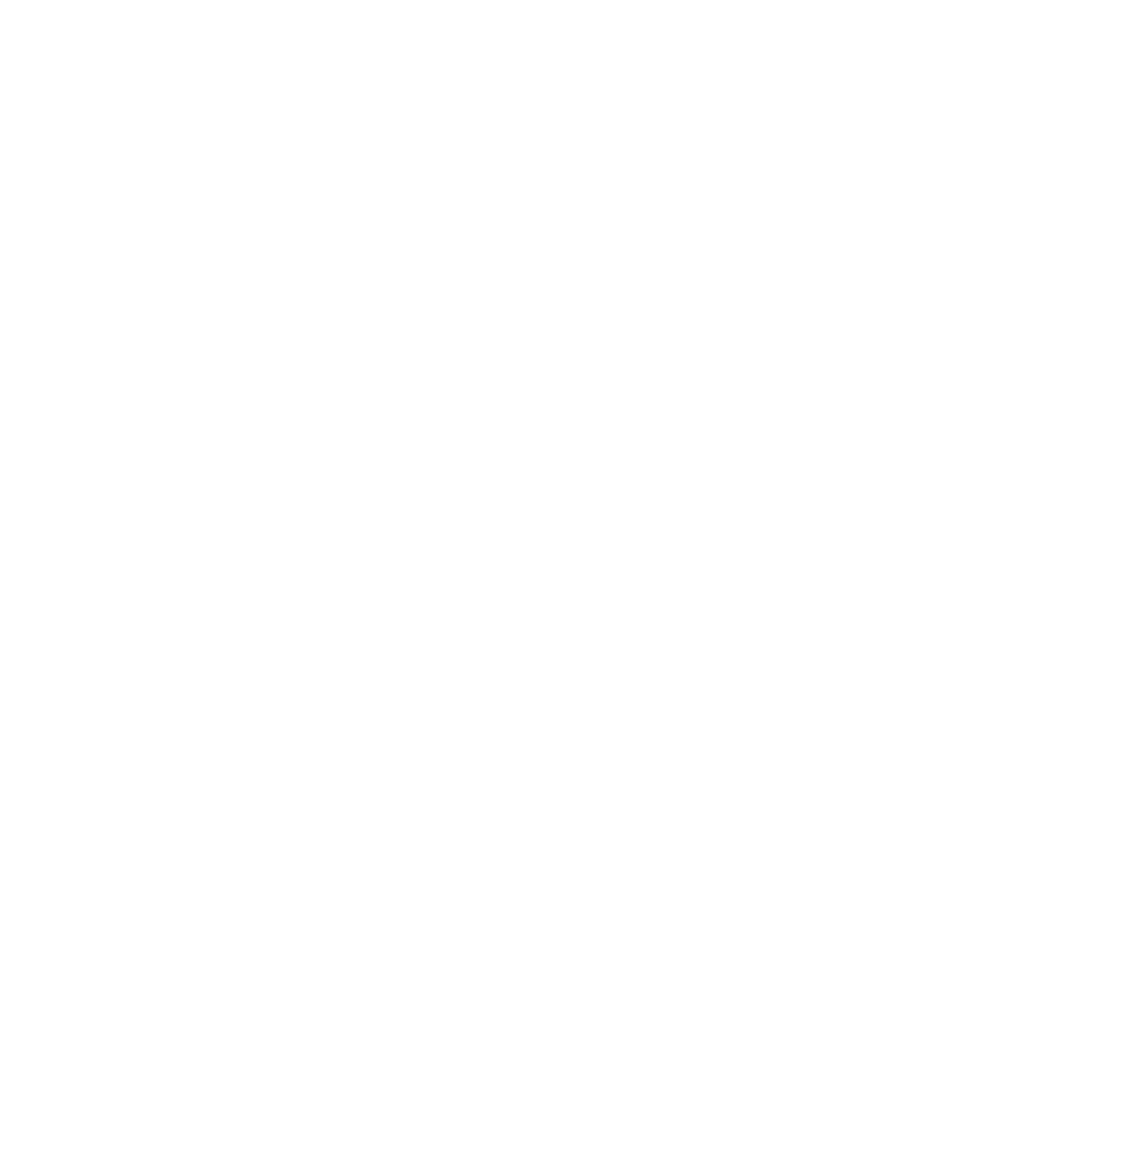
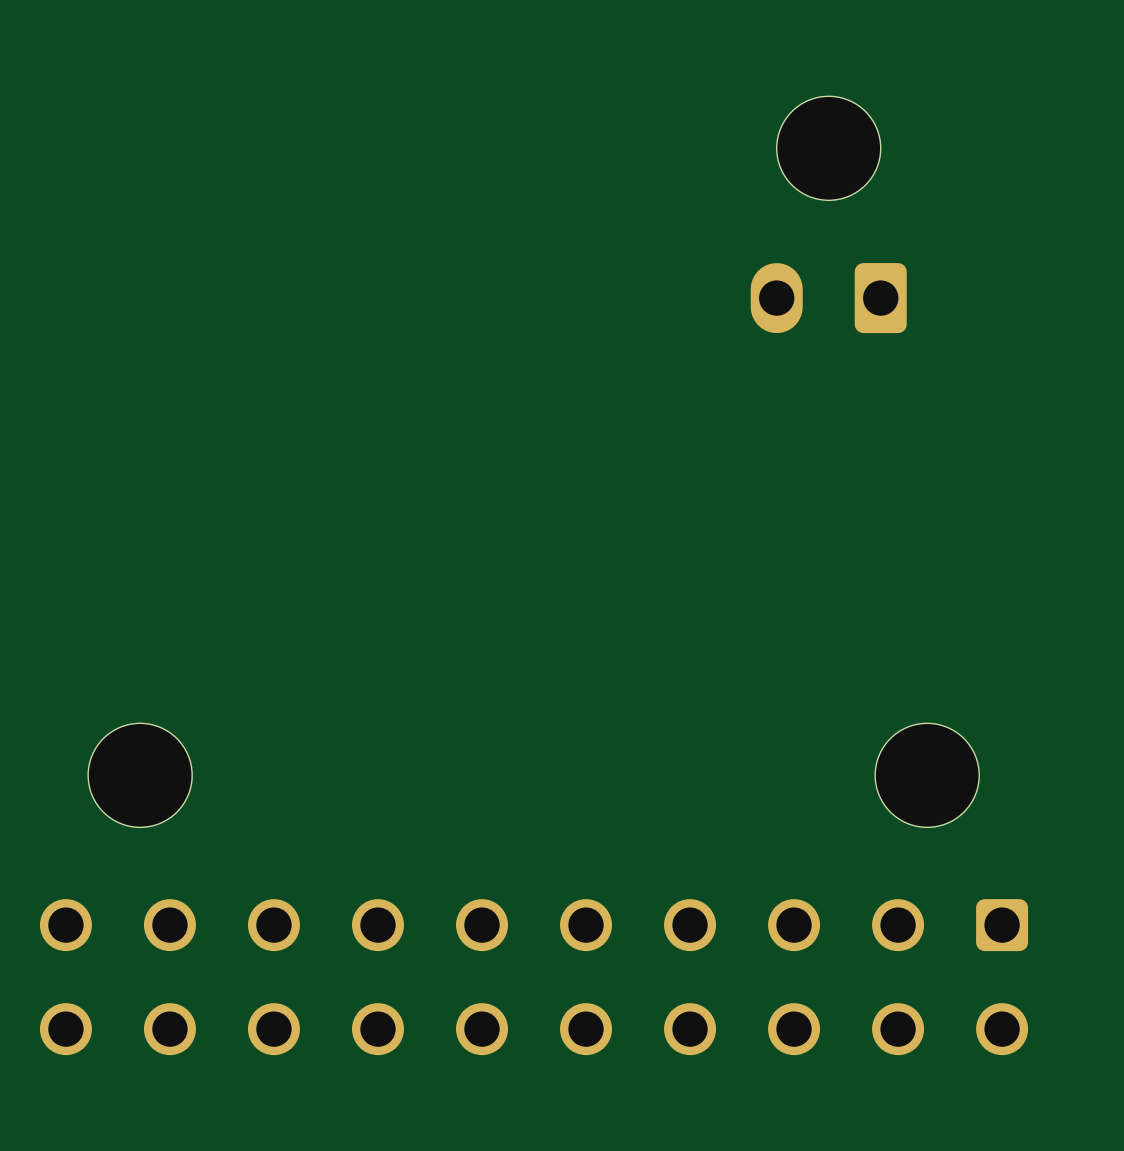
part: none -> (828, 214)
part: none -> (534, 889)

